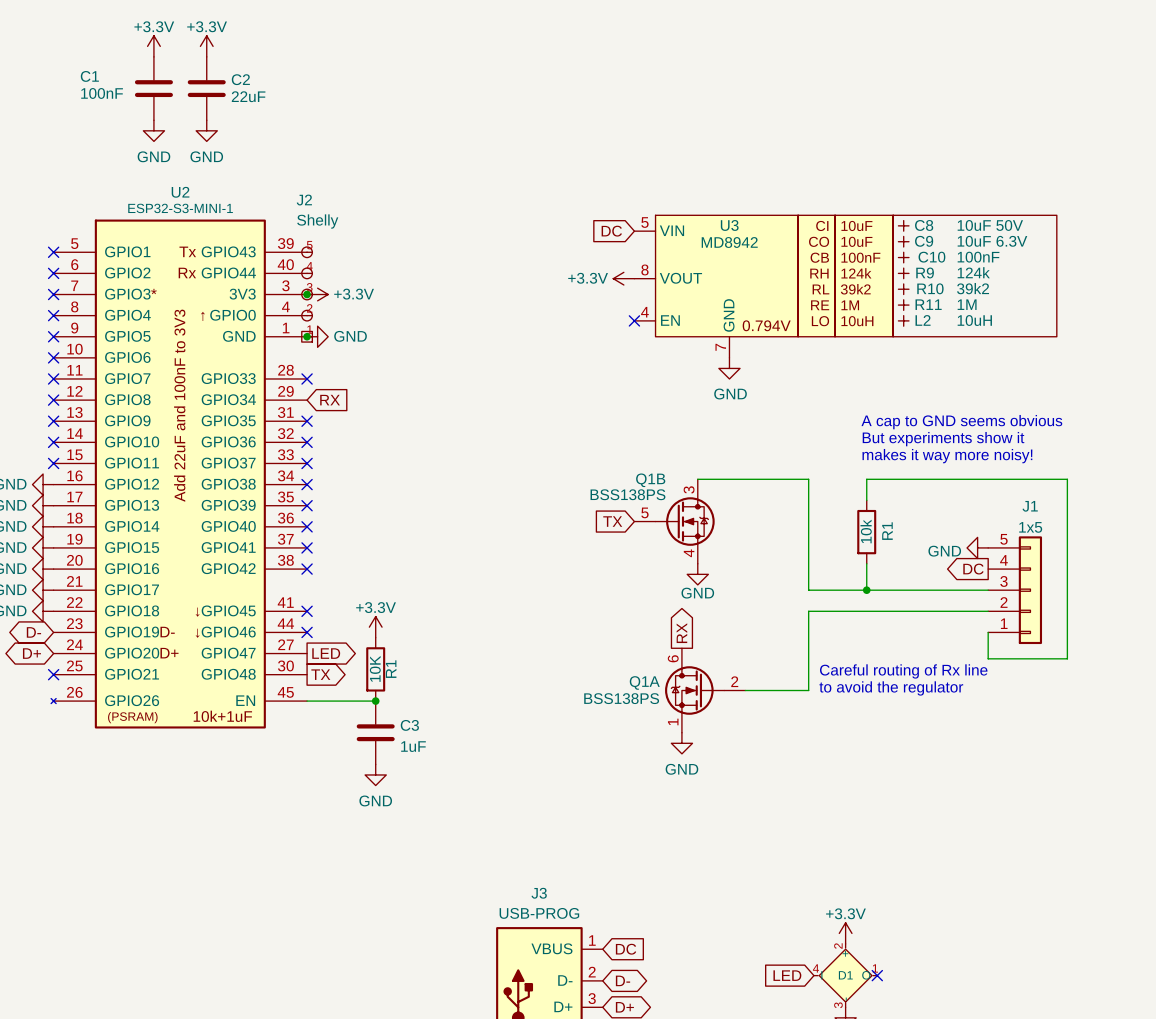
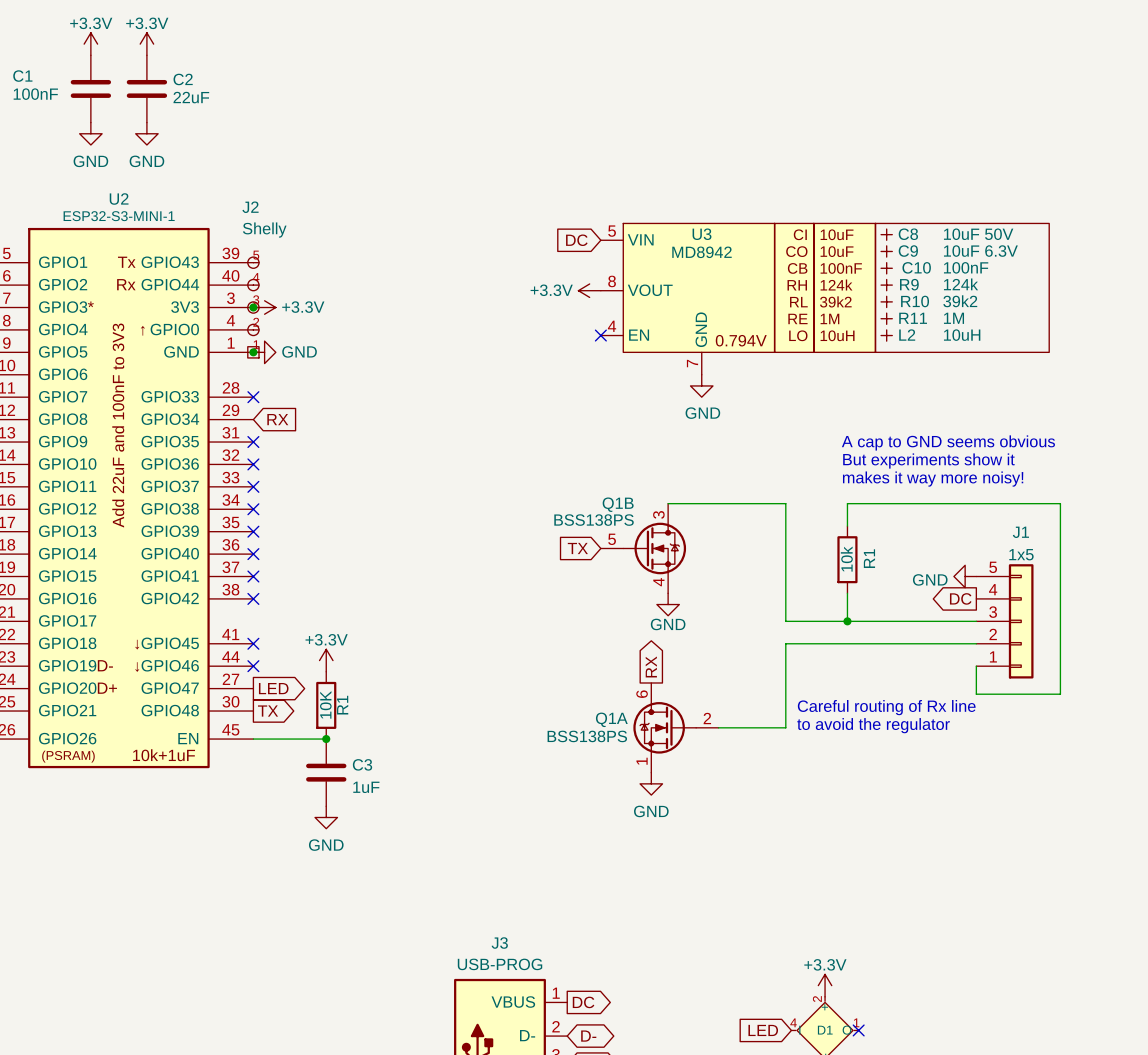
global label shape: input (626, 949) -> output (583, 1002)

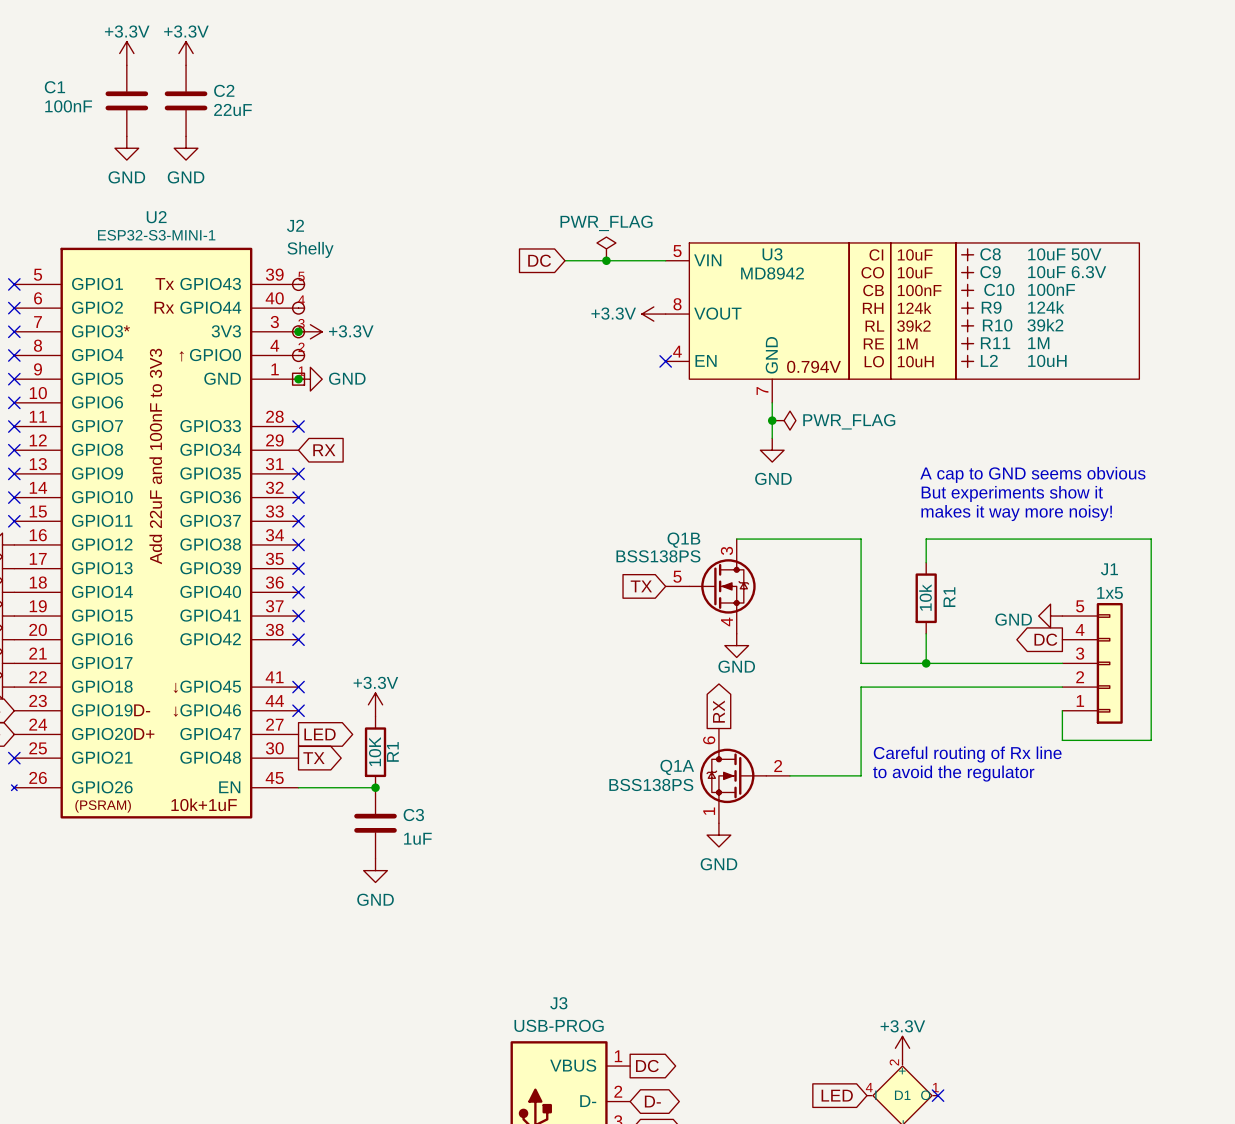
power symbol: none -> PWR_FLAG (606, 248)
wire: none -> (565, 260) (665, 260)
junction: none -> (606, 260)
global label position: DC (576, 240) -> DC (539, 260)
wire: none -> (772, 402) (772, 438)
power symbol position: GND (701, 385) -> GND (772, 450)
junction: none -> (772, 420)
power symbol: none -> PWR_FLAG (784, 420)

